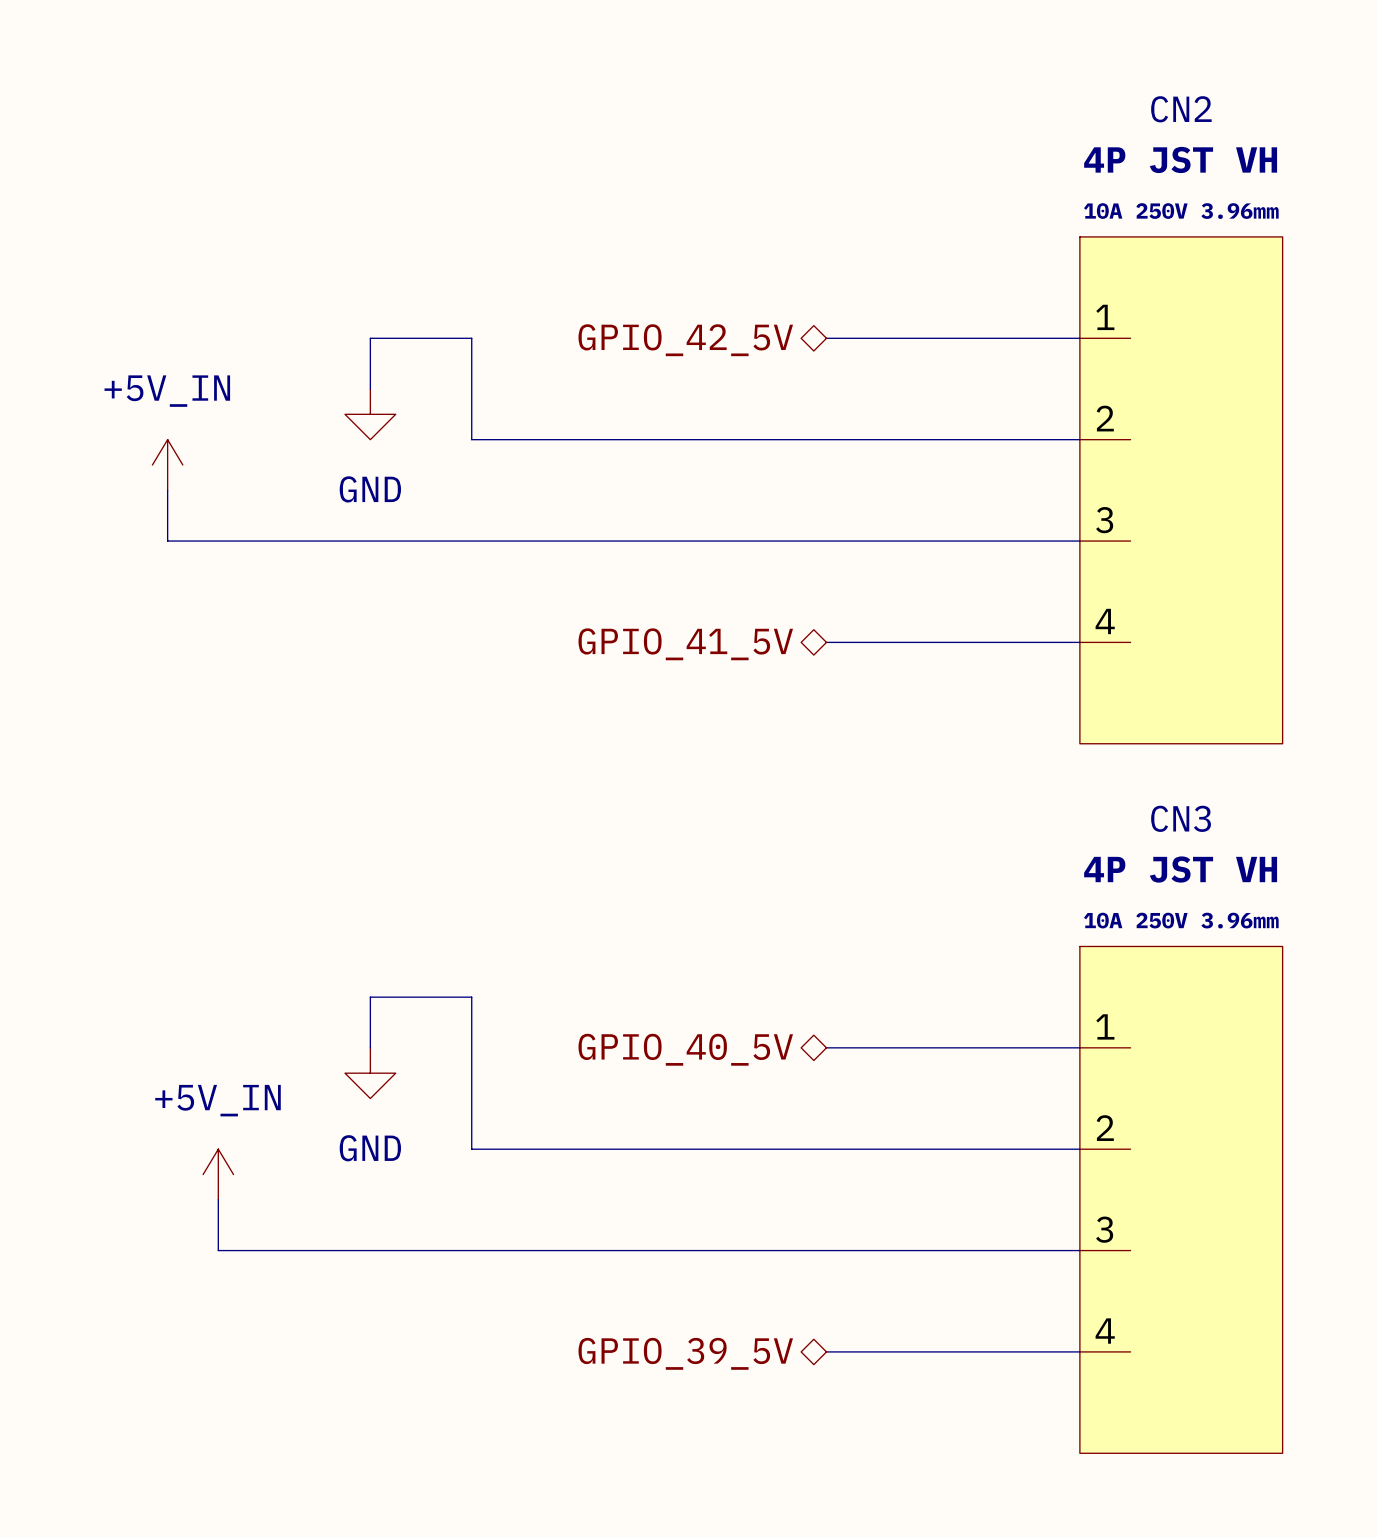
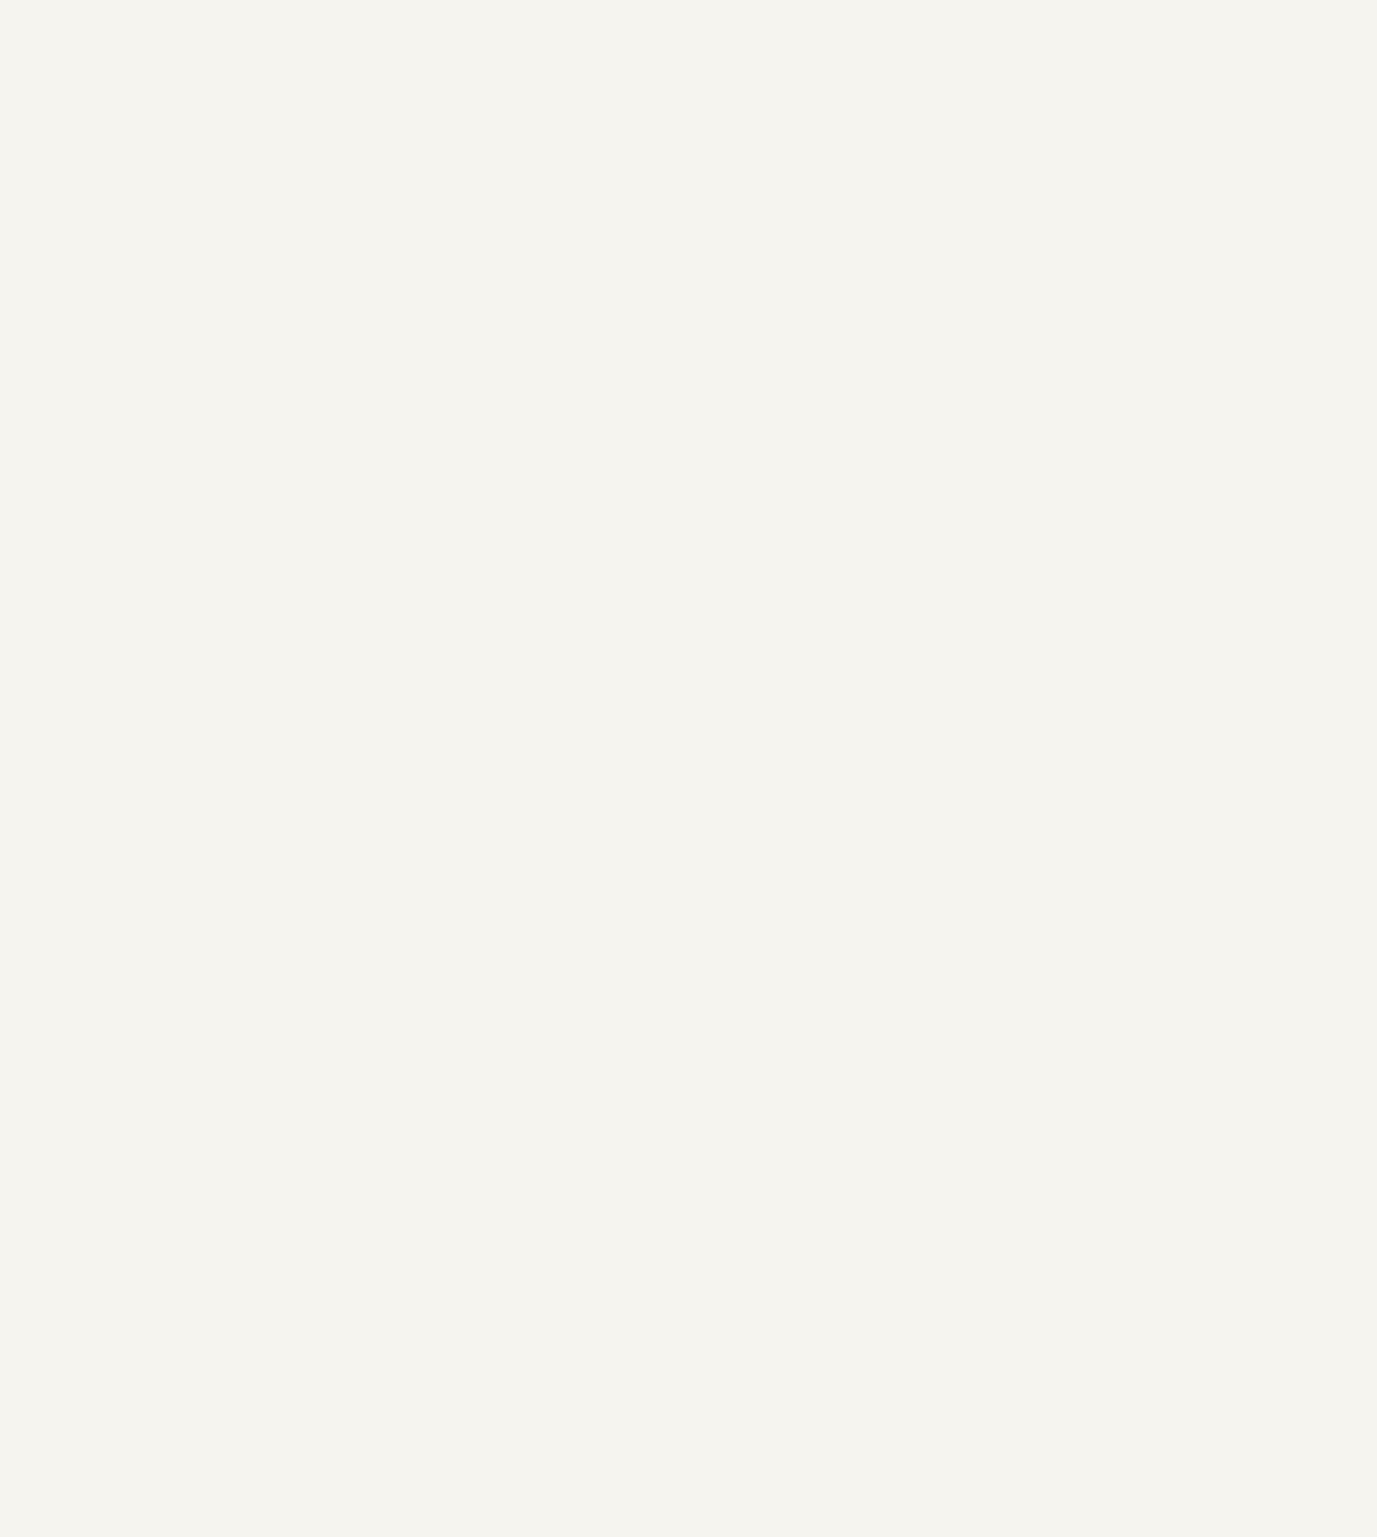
wire: (826, 338) (1079, 338) -> none
hierarchical label: GPIO_42_5V (685, 340) -> none
wire: (370, 388) (370, 338) (471, 338) (471, 439) (1079, 439) -> none
power symbol: GND (370, 414) -> none
power symbol: +5V_IN (167, 465) -> none
wire: (167, 490) (167, 541) (1079, 541) -> none
CN2: 4P JST VH (1181, 490) -> none
wire: (826, 642) (1079, 642) -> none
hierarchical label: GPIO_41_5V (685, 644) -> none
wire: (370, 1047) (370, 997) (471, 997) (471, 1149) (1079, 1149) -> none
wire: (826, 1047) (1079, 1047) -> none
hierarchical label: GPIO_40_5V (685, 1049) -> none
power symbol: GND (370, 1073) -> none
power symbol: +5V_IN (218, 1174) -> none
wire: (218, 1199) (218, 1250) (1079, 1250) -> none
CN3: 4P JST VH (1181, 1199) -> none
wire: (826, 1351) (1079, 1351) -> none
hierarchical label: GPIO_39_5V (685, 1353) -> none

